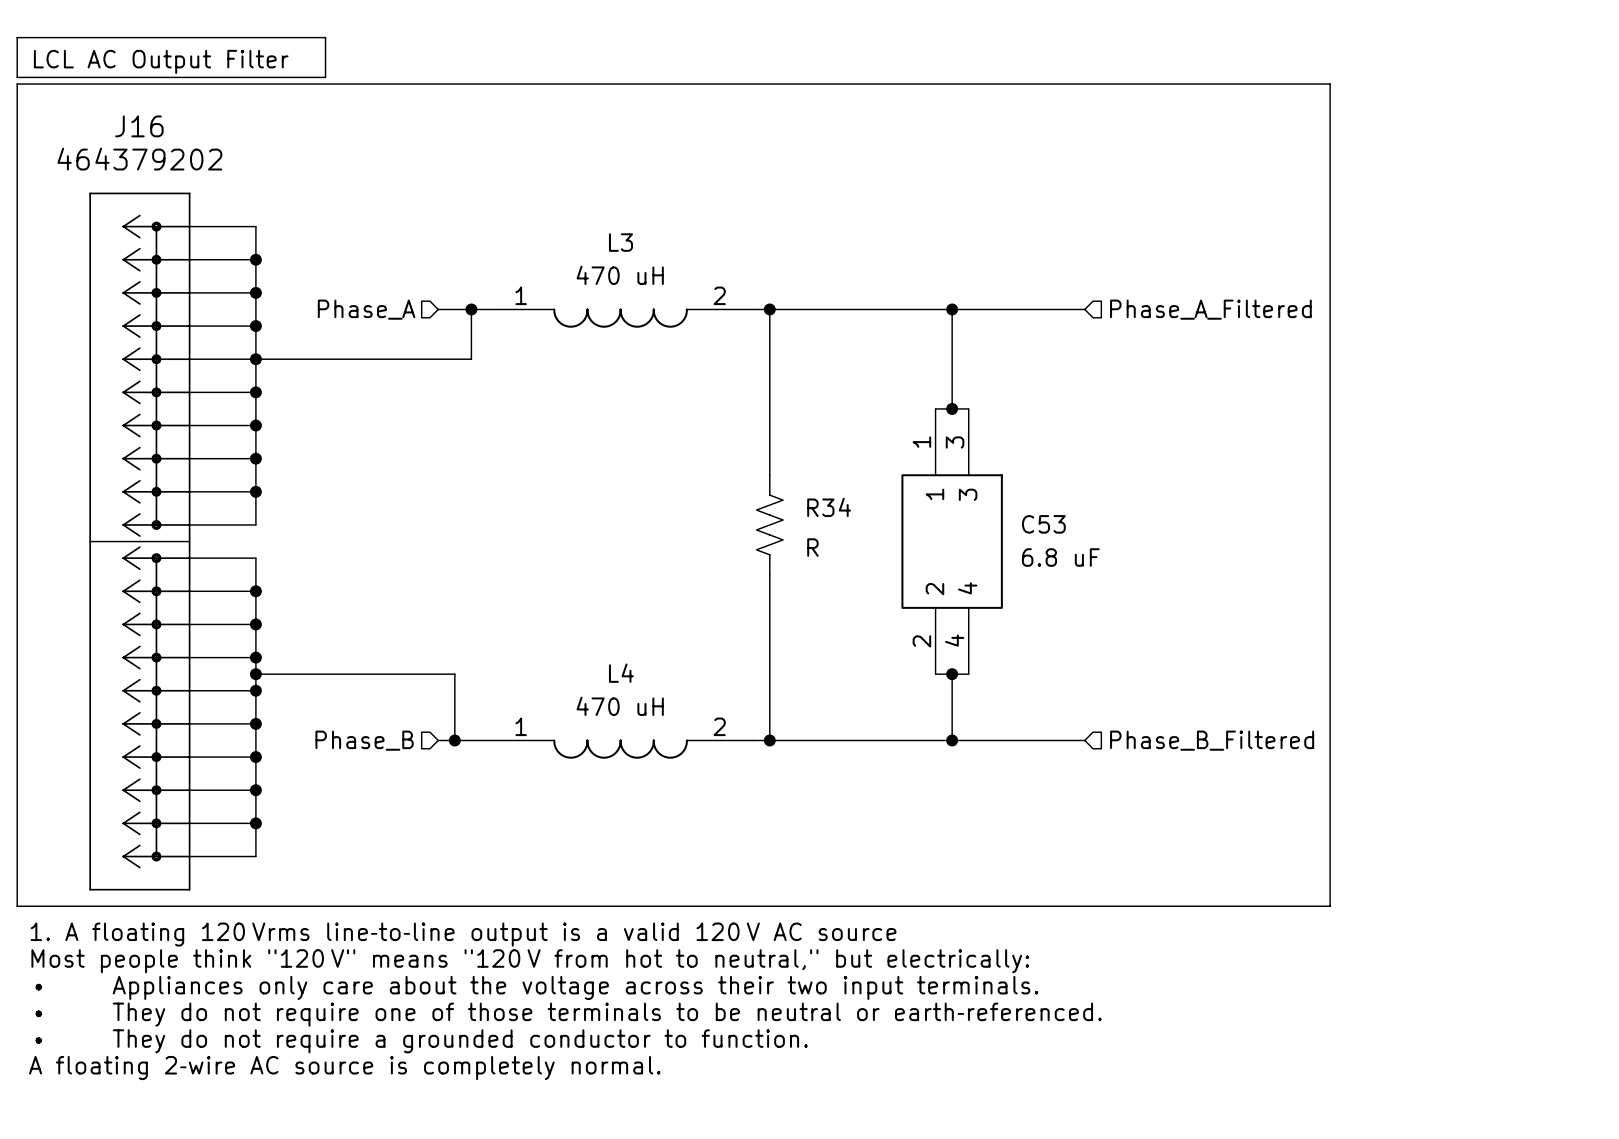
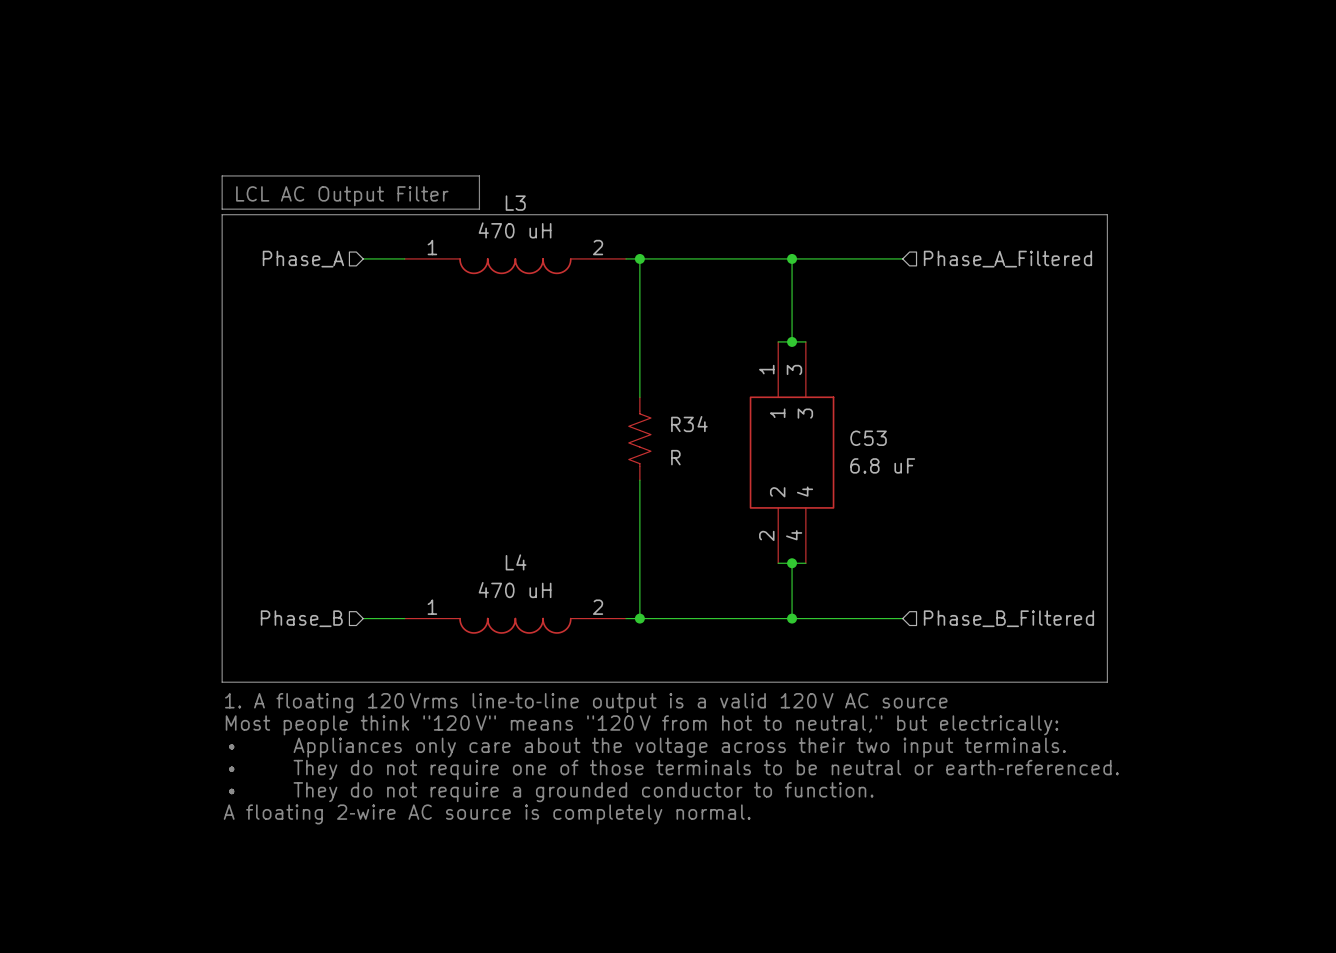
line: (17, 37) (17, 77) (325, 77) (325, 37) (17, 37) -> (222, 175) (222, 209) (479, 209) (479, 175) (222, 175)
text position: LCL AC Output Filter (161, 61) -> LCL AC Output Filter (342, 196)
wire: (255, 226) (255, 524) -> none
line: (1330, 256) (1330, 84) (17, 84) (17, 906) (1330, 906) (1330, 816) -> (1107, 214) (222, 214) (222, 682) (1107, 682)
junction: (255, 259) -> none
junction: (255, 292) -> none
wire: (471, 309) (471, 359) (255, 359) -> none
junction: (471, 309) -> none
junction: (255, 326) -> none
junction: (255, 359) -> none
junction: (255, 392) -> none
junction: (255, 425) -> none
junction: (255, 458) -> none
junction: (255, 491) -> none
J16: 464379202 (172, 541) -> none
wire: (255, 558) (255, 856) -> none
junction: (255, 591) -> none
junction: (255, 624) -> none
junction: (255, 657) -> none
wire: (255, 674) (454, 674) (454, 740) -> none
junction: (255, 674) -> none
junction: (255, 690) -> none
junction: (255, 723) -> none
junction: (454, 740) -> none
junction: (255, 757) -> none
junction: (255, 790) -> none
junction: (255, 823) -> none
text position: 1. A floating 120 Vrms line‑to‑line output is a valid 120 V AC source (463, 934) -> 1. A floating 120 Vrms line‑to‑line output is a valid 120 V AC source (586, 703)
text position: Most people think "120 V" means "120 V from hot to neutral," but electrically: (530, 961) -> Most people think "120 V" means "120 V from hot to neutral," but electrically: (642, 725)
text position: • Appliances only care about the voltage across their two input terminals. (536, 987) -> • Appliances only care about the voltage across their two input terminals. (647, 747)
text position: • They do not require one of those terminals to be neutral or earth‑referenced. (568, 1014) -> • They do not require one of those terminals to be neutral or earth‑referenced. (673, 769)
text position: • They do not require a grounded conductor to function. (421, 1041) -> • They do not require a grounded conductor to function. (551, 792)
text position: A floating 2‑wire AC source is completely normal. (344, 1068) -> A floating 2‑wire AC source is completely normal. (487, 814)

